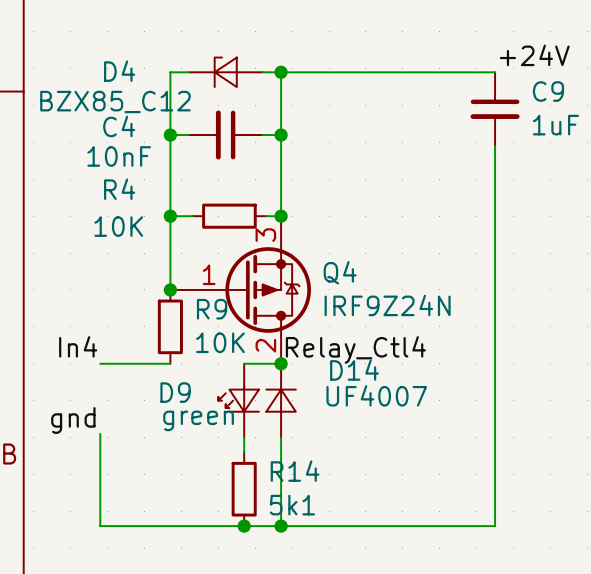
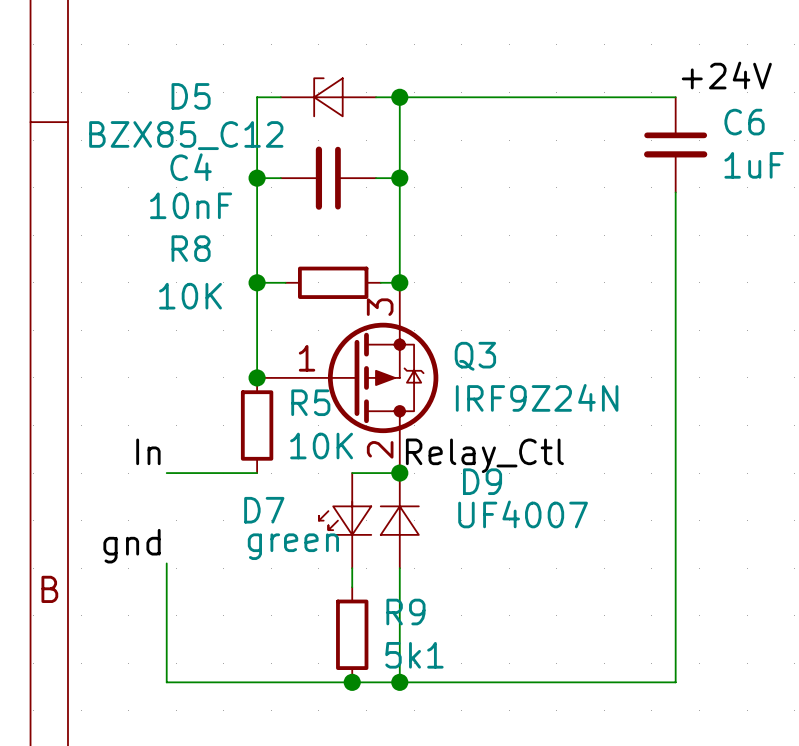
D4 name: D4 (119, 71) -> D5 (191, 96)
C9 name: C9 (548, 91) -> C6 (744, 122)
R4 name: R4 (119, 189) -> R8 (191, 248)
Q4 name: Q4 (340, 272) -> Q3 (475, 356)
R9 name: R9 (212, 309) -> R5 (310, 402)
label: In4 (78, 346) -> In (148, 451)
label: Relay_Ctl4 (355, 349) -> Relay_Ctl (484, 455)
D14 name: D14 (354, 370) -> D9 (482, 481)
D9 name: D9 (175, 392) -> D7 (264, 510)
R14 name: R14 (295, 471) -> R9 (405, 612)

